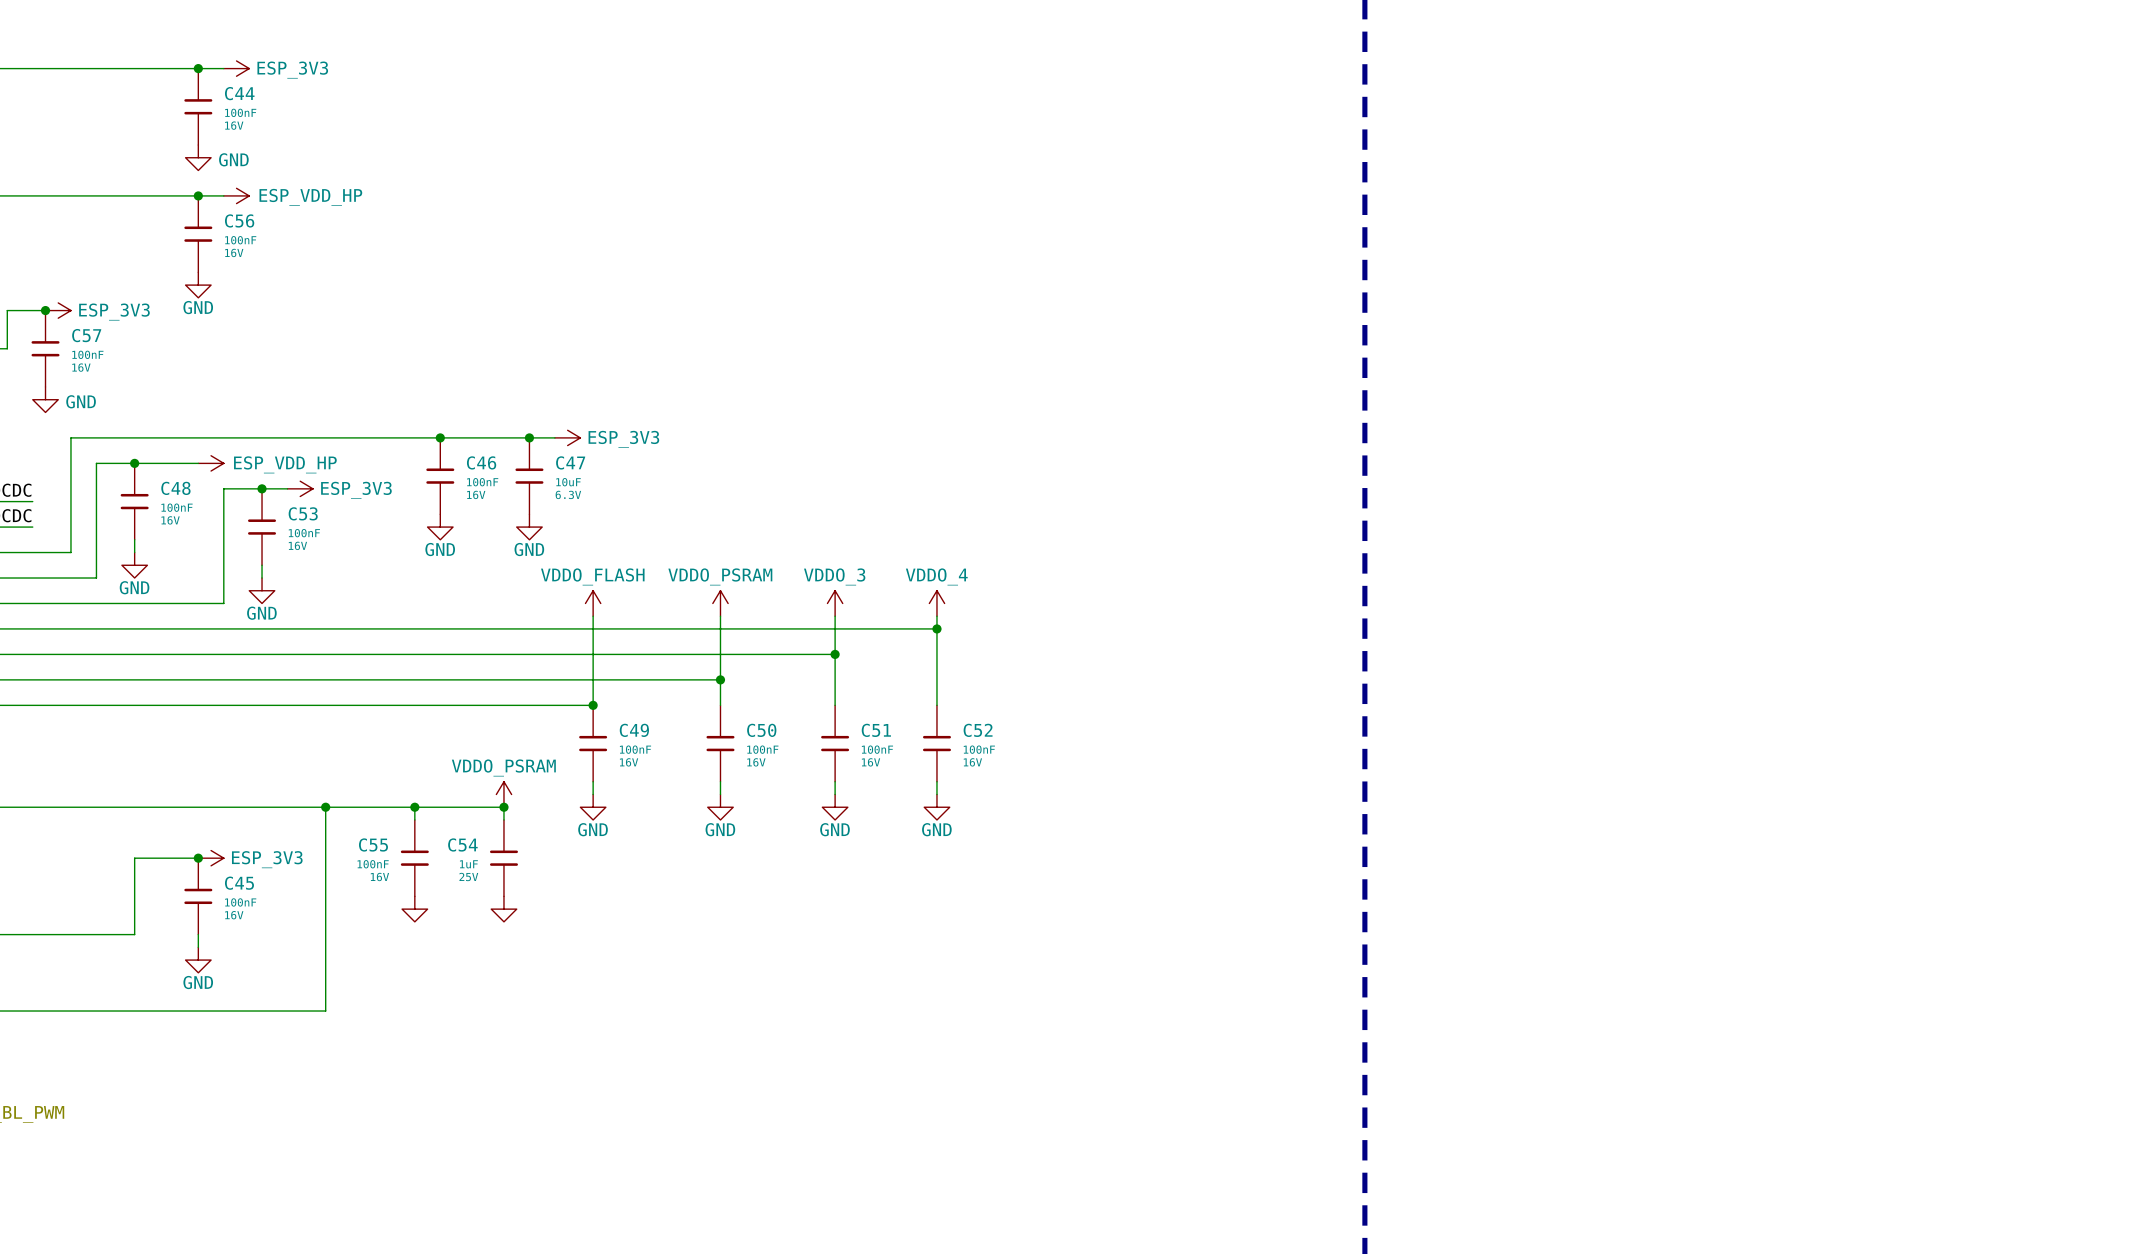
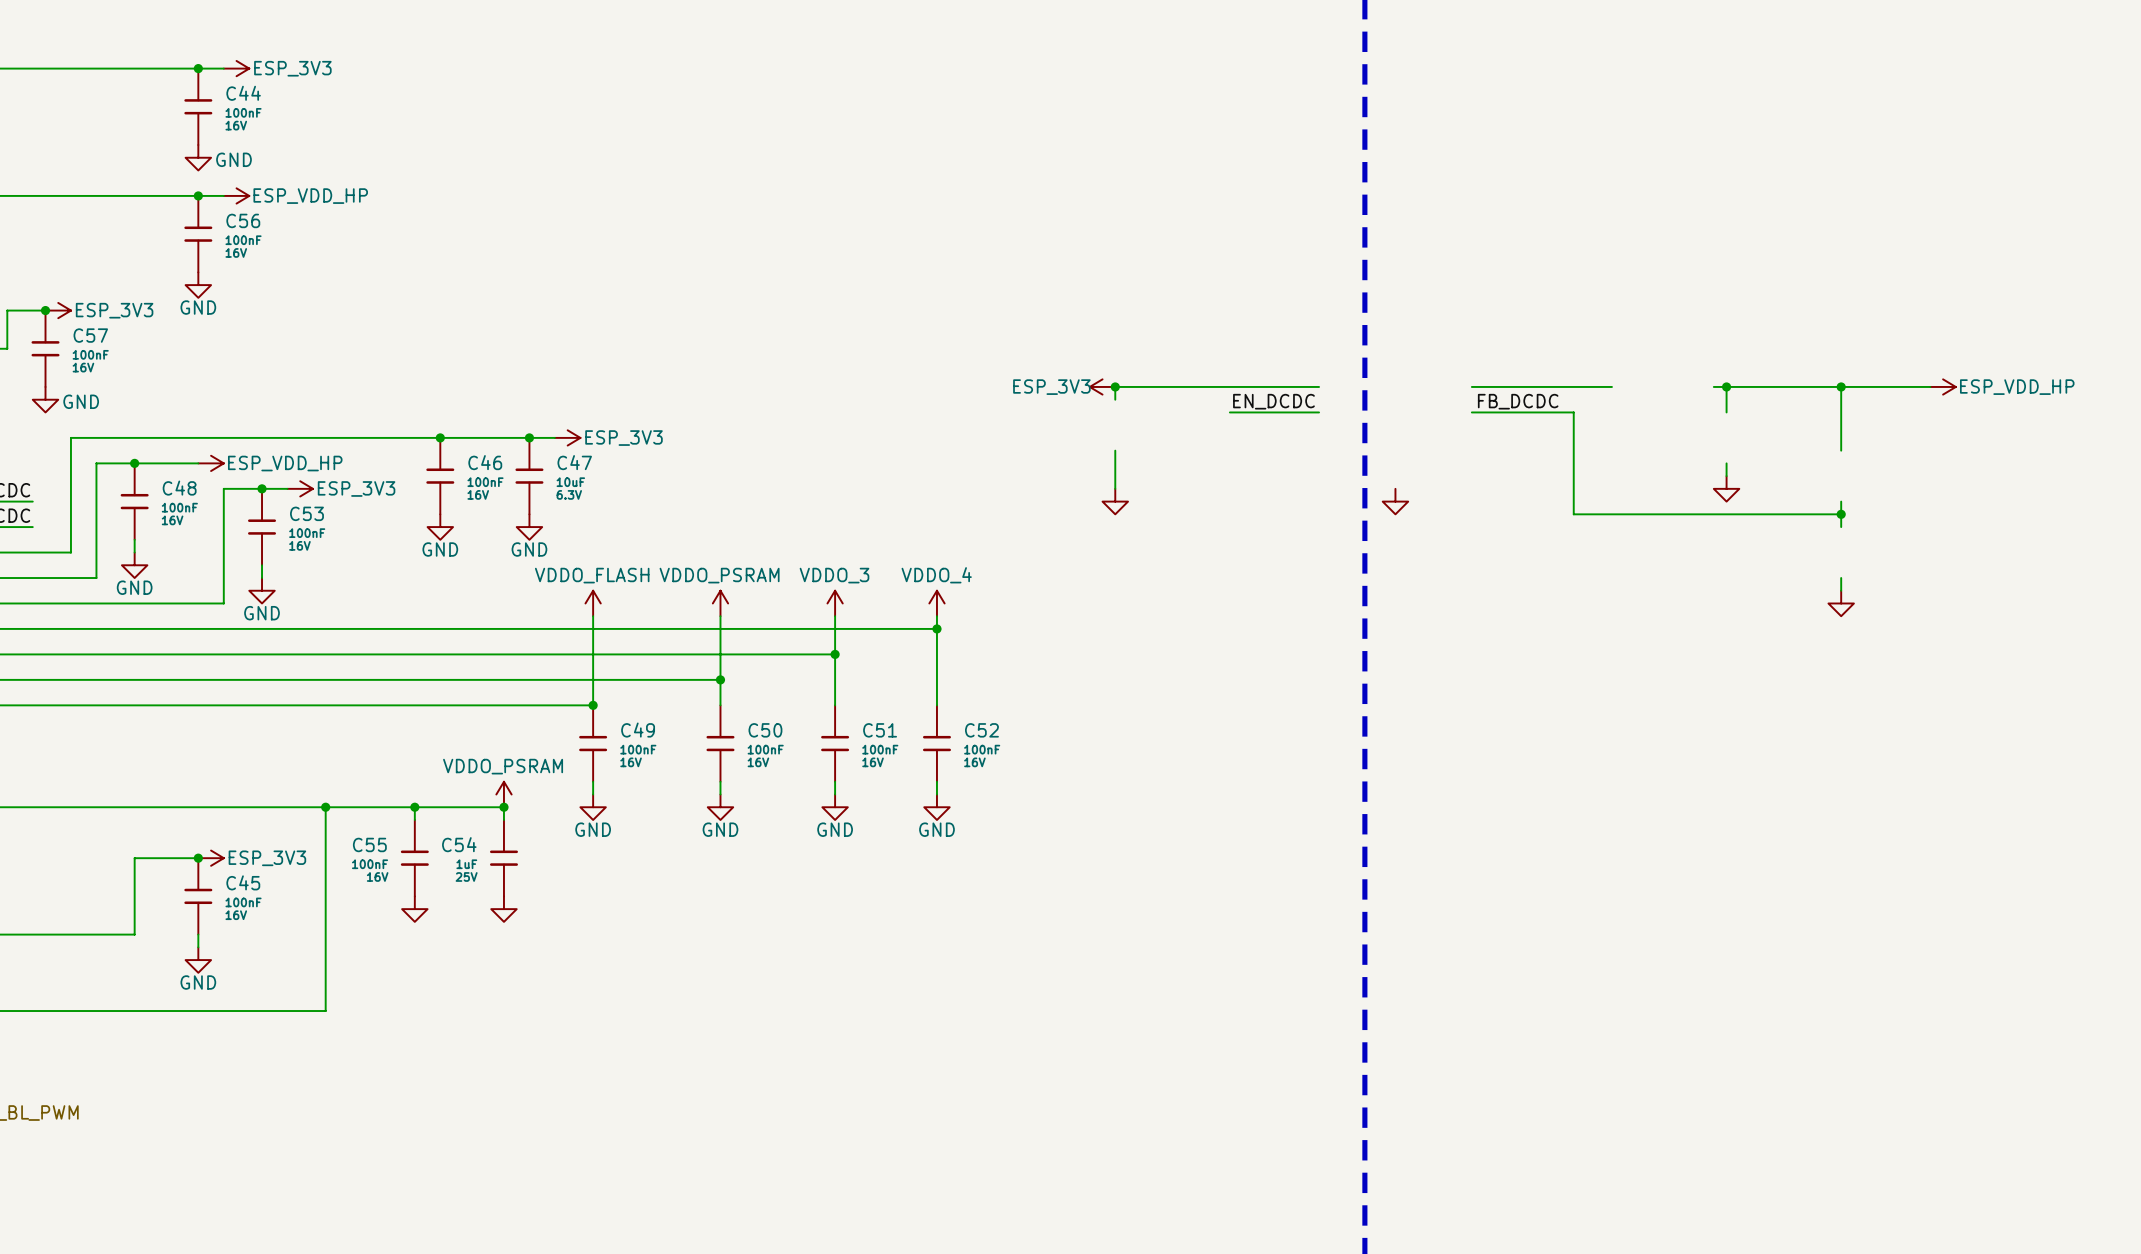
power symbol: none -> ESP_3V3 (1102, 386)
junction: none -> (1115, 386)
wire: none -> (1319, 386) (1115, 386) (1115, 399)
wire: none -> (1471, 386) (1611, 386)
wire: none -> (1713, 386) (1930, 386)
wire: none -> (1726, 386) (1726, 412)
junction: none -> (1726, 386)
wire: none -> (1841, 386) (1841, 450)
junction: none -> (1841, 386)
power symbol: none -> ESP_VDD_HP (1943, 386)
label: none -> EN_DCDC (1273, 401)
label: none -> FB_DCDC (1518, 401)
wire: none -> (1229, 412) (1319, 412)
wire: none -> (1471, 412) (1573, 412) (1573, 514) (1841, 514)
wire: none -> (1115, 450) (1115, 488)
wire: none -> (1726, 463) (1726, 476)
power symbol: none -> (1726, 488)
power symbol: none -> (1115, 501)
power symbol: none -> (1395, 501)
wire: none -> (1841, 501) (1841, 527)
junction: none -> (1841, 514)
wire: none -> (1841, 578) (1841, 590)
power symbol: none -> (1841, 603)

